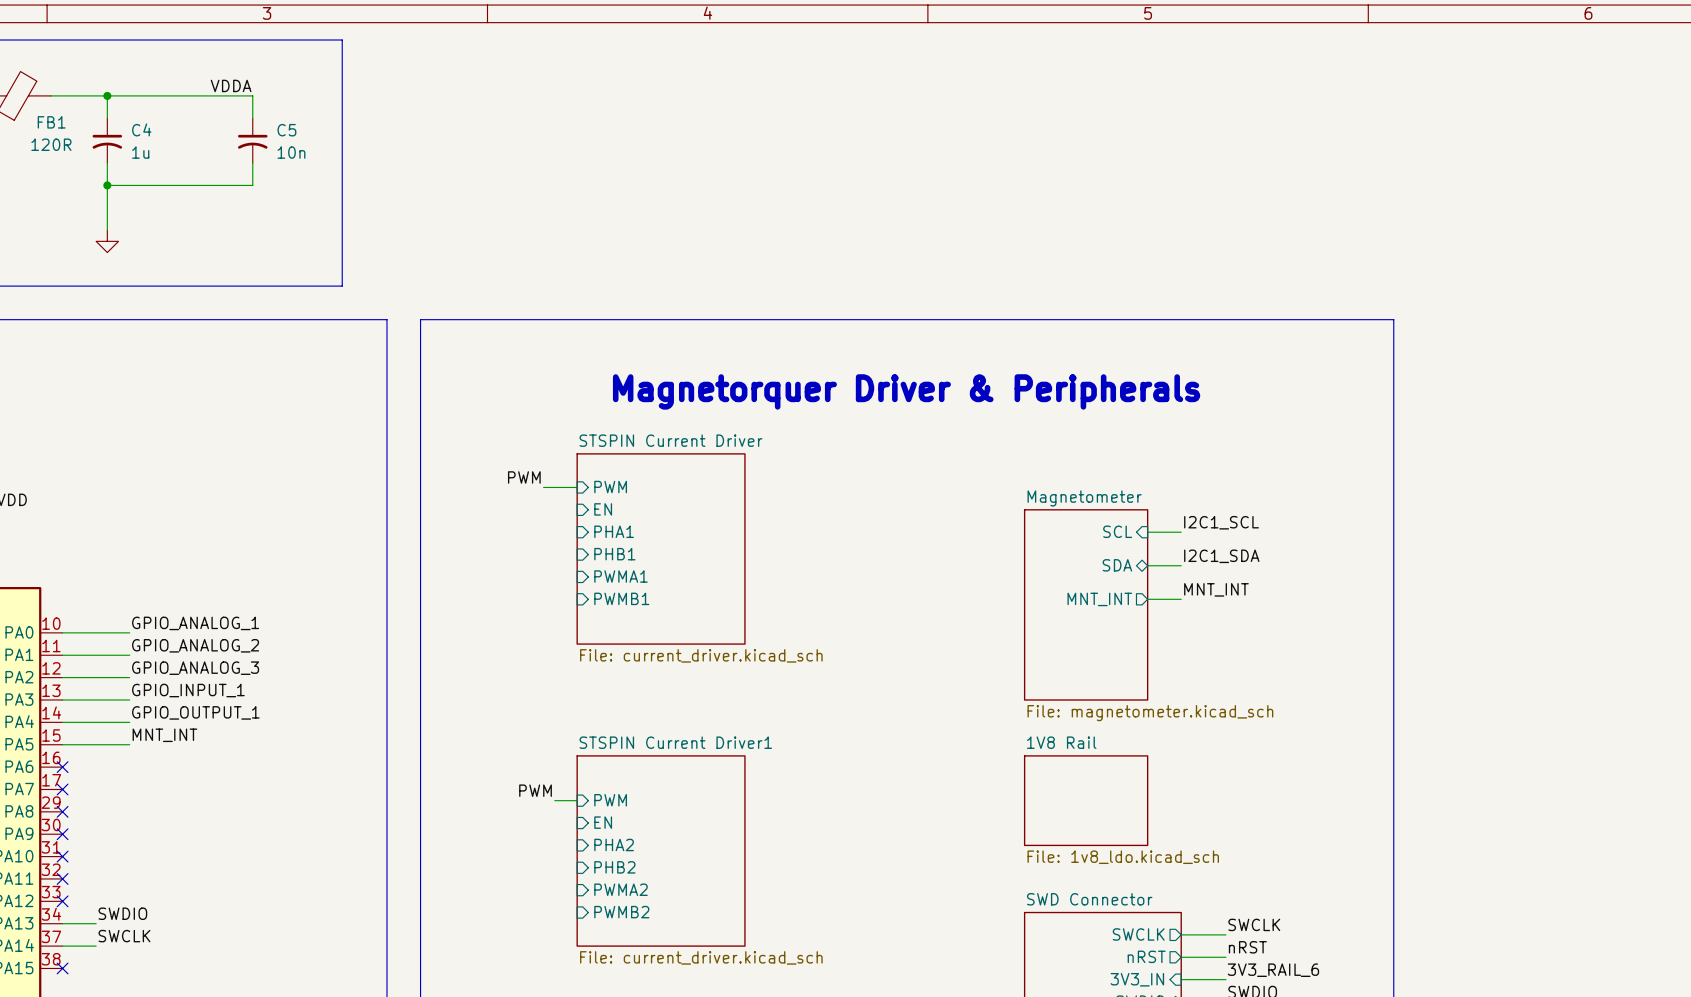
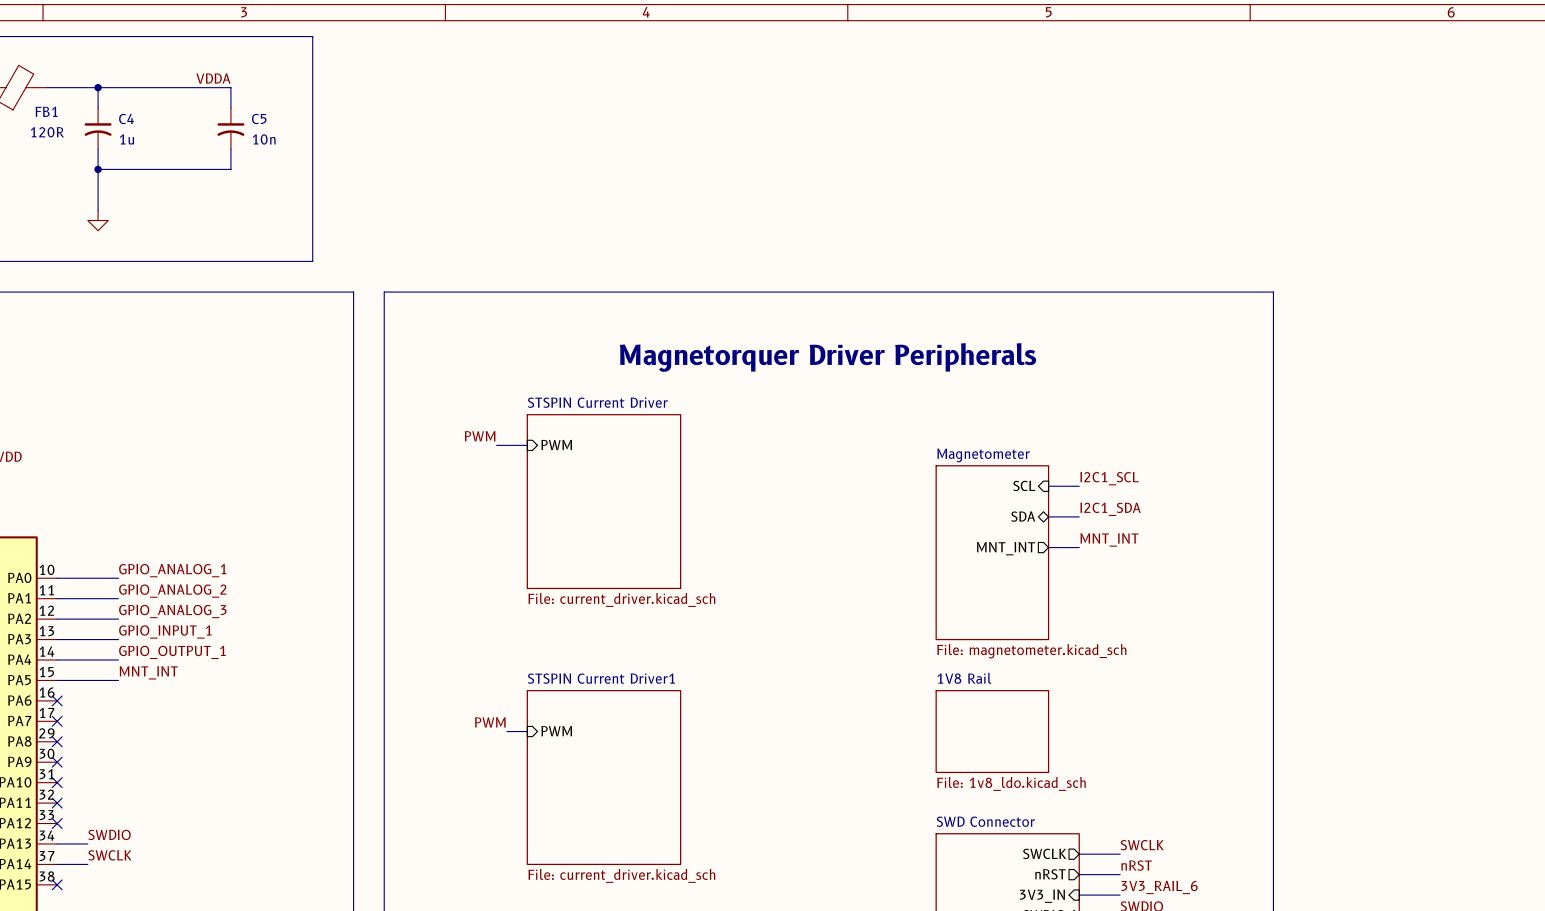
text: Magnetorquer Driver & Peripherals (906, 391) -> Magnetorquer Driver Peripherals (827, 357)
sheet pin: EN (603, 509) -> none
sheet pin: PHA1 (614, 531) -> none
sheet pin: PHB1 (614, 554) -> none
sheet pin: PWMA1 (621, 576) -> none
sheet pin: PWMB1 (621, 598) -> none
sheet pin: EN (603, 822) -> none
sheet pin: PHA2 (614, 844) -> none
sheet pin: PHB2 (614, 867) -> none
sheet pin: PWMA2 (621, 889) -> none
sheet pin: PWMB2 (621, 912) -> none

